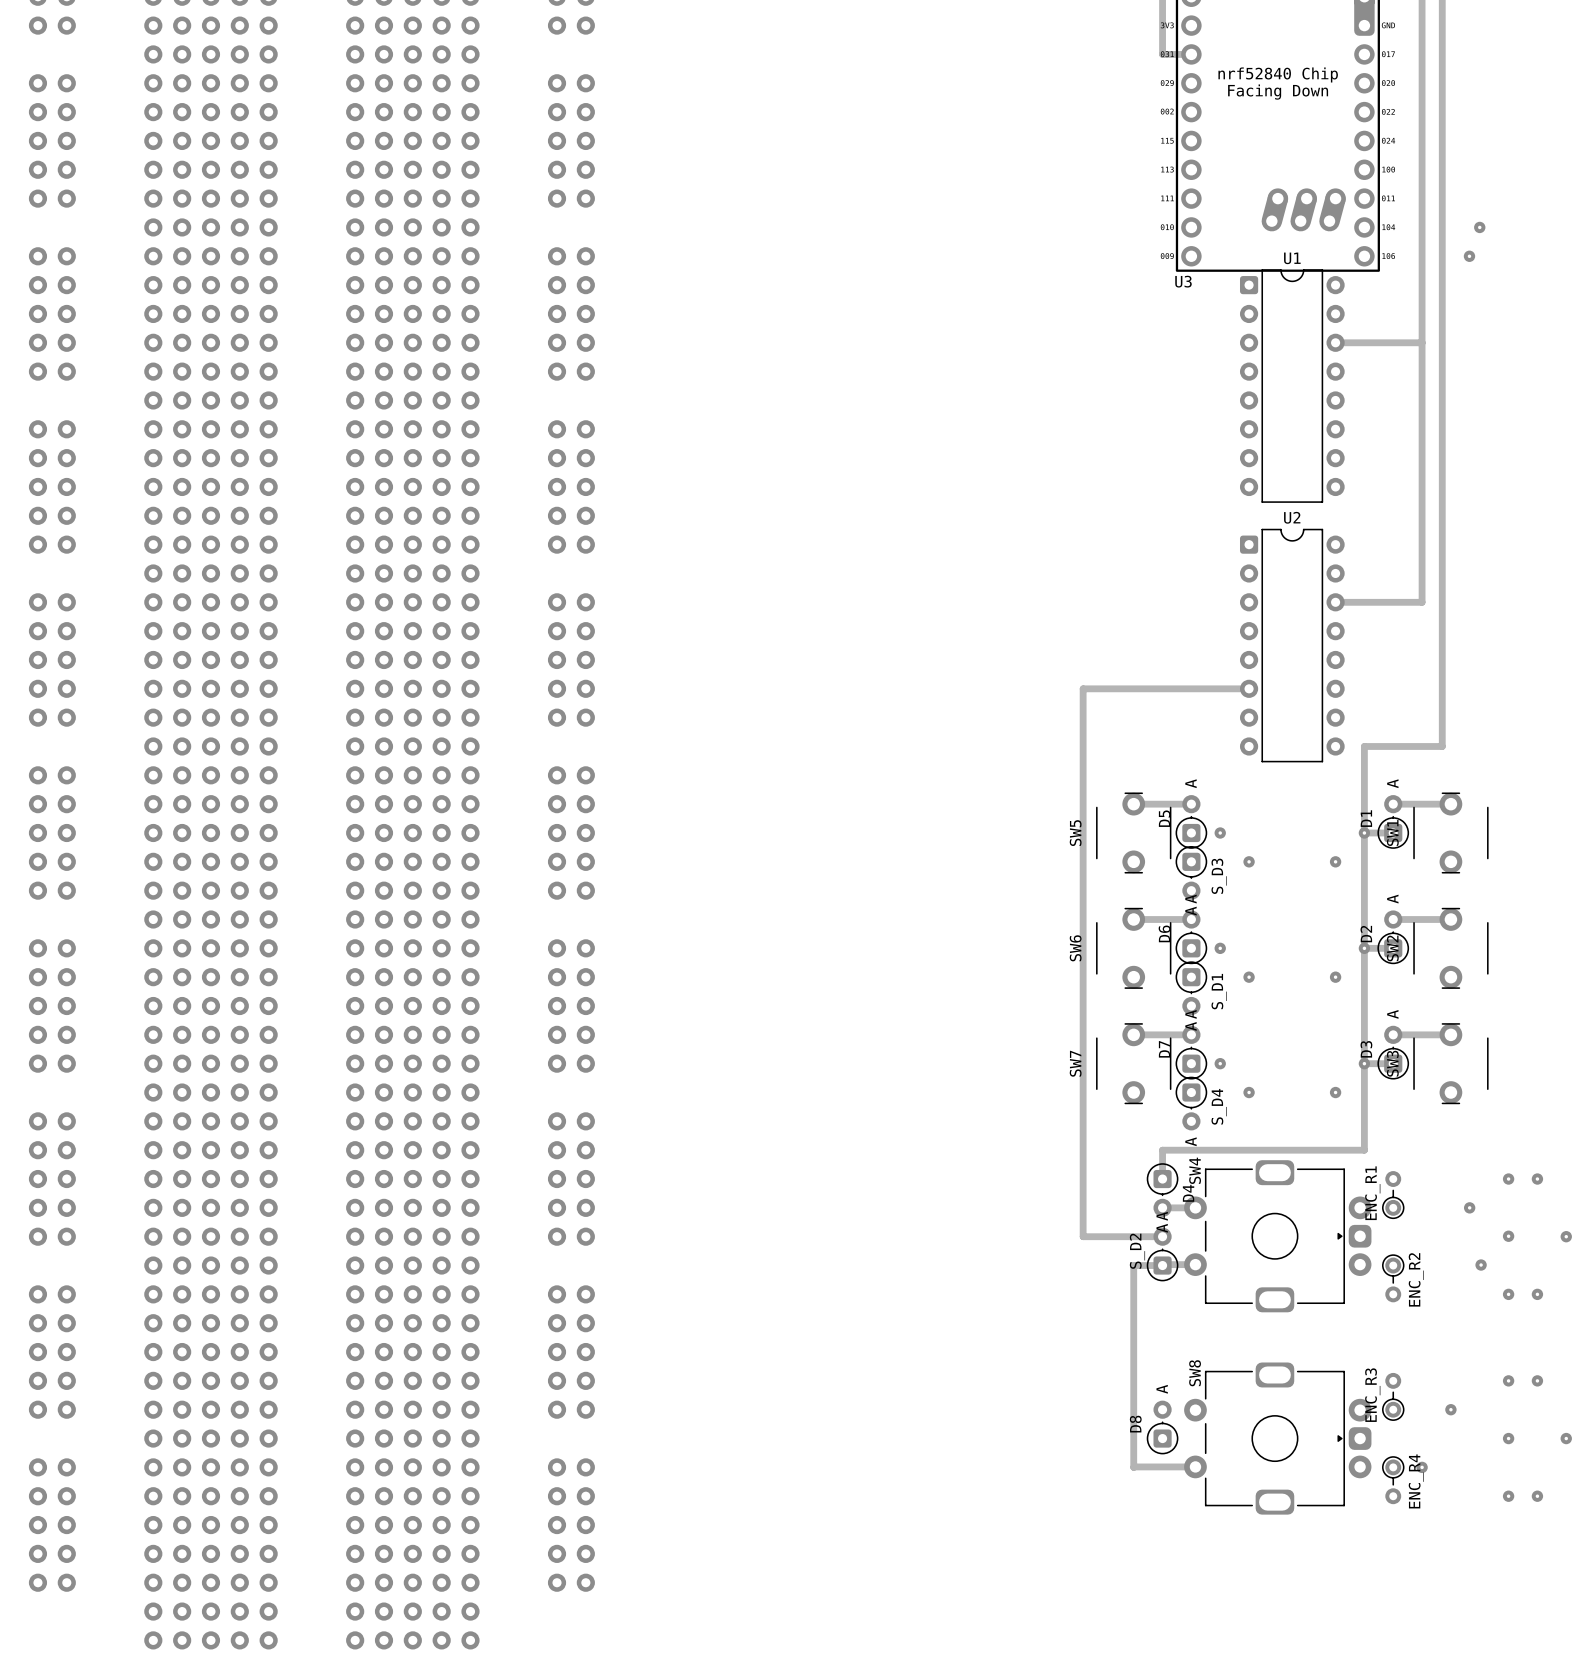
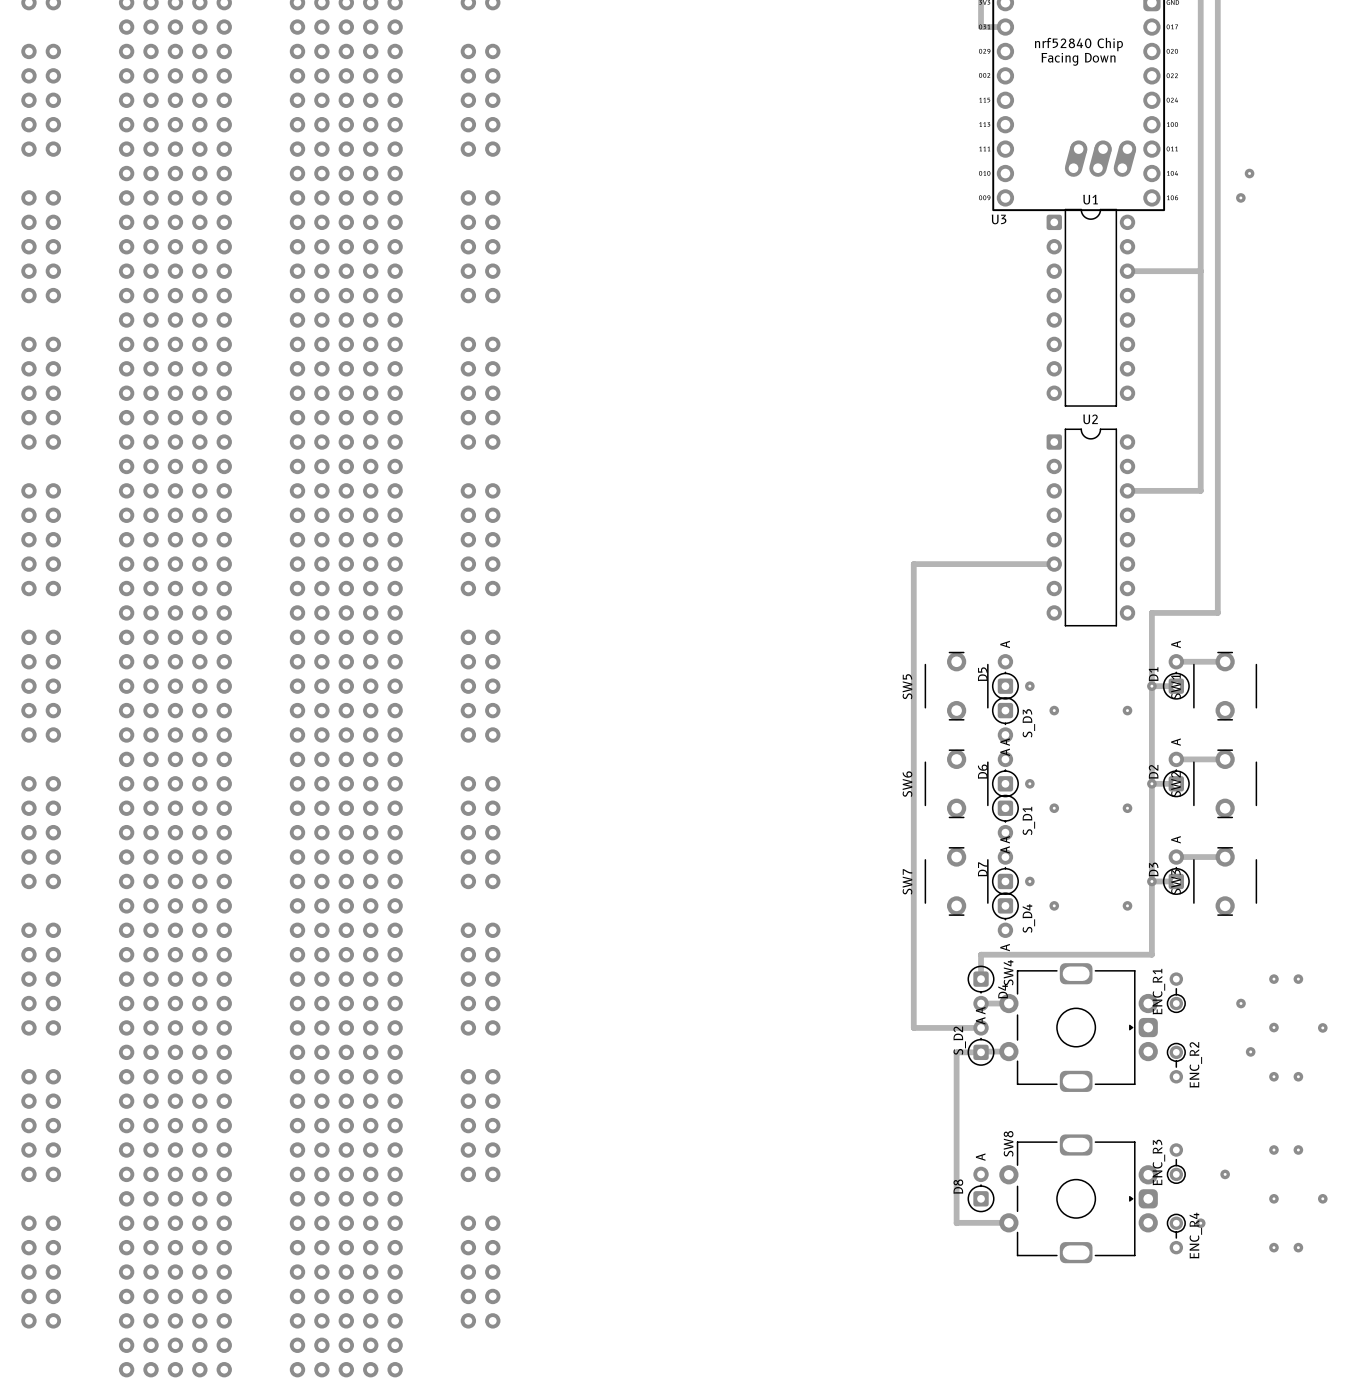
track: (1133, 804) (1191, 804) -> none
track: (1133, 919) (1191, 919) -> none
track: (1133, 1034) (1191, 1034) -> none

